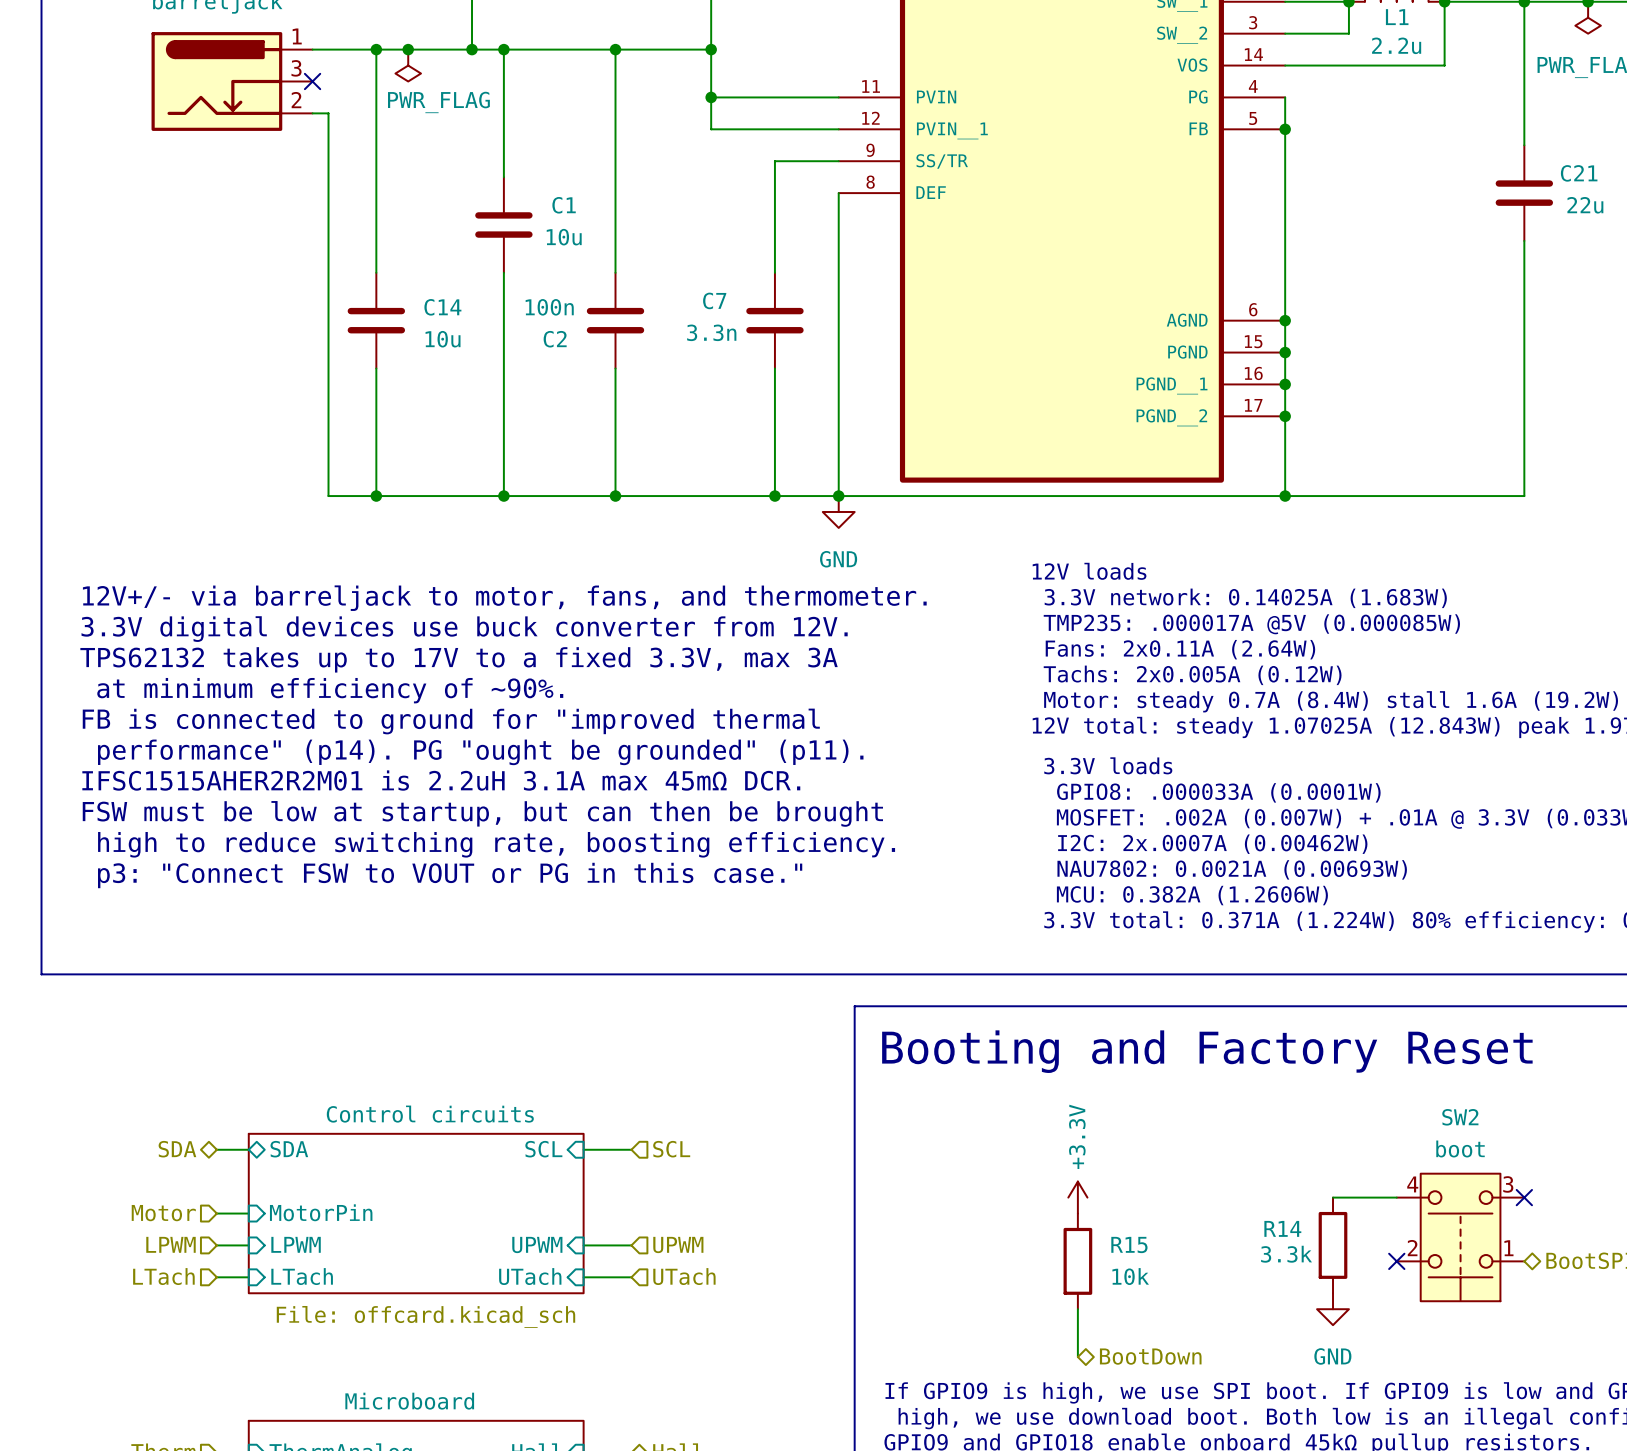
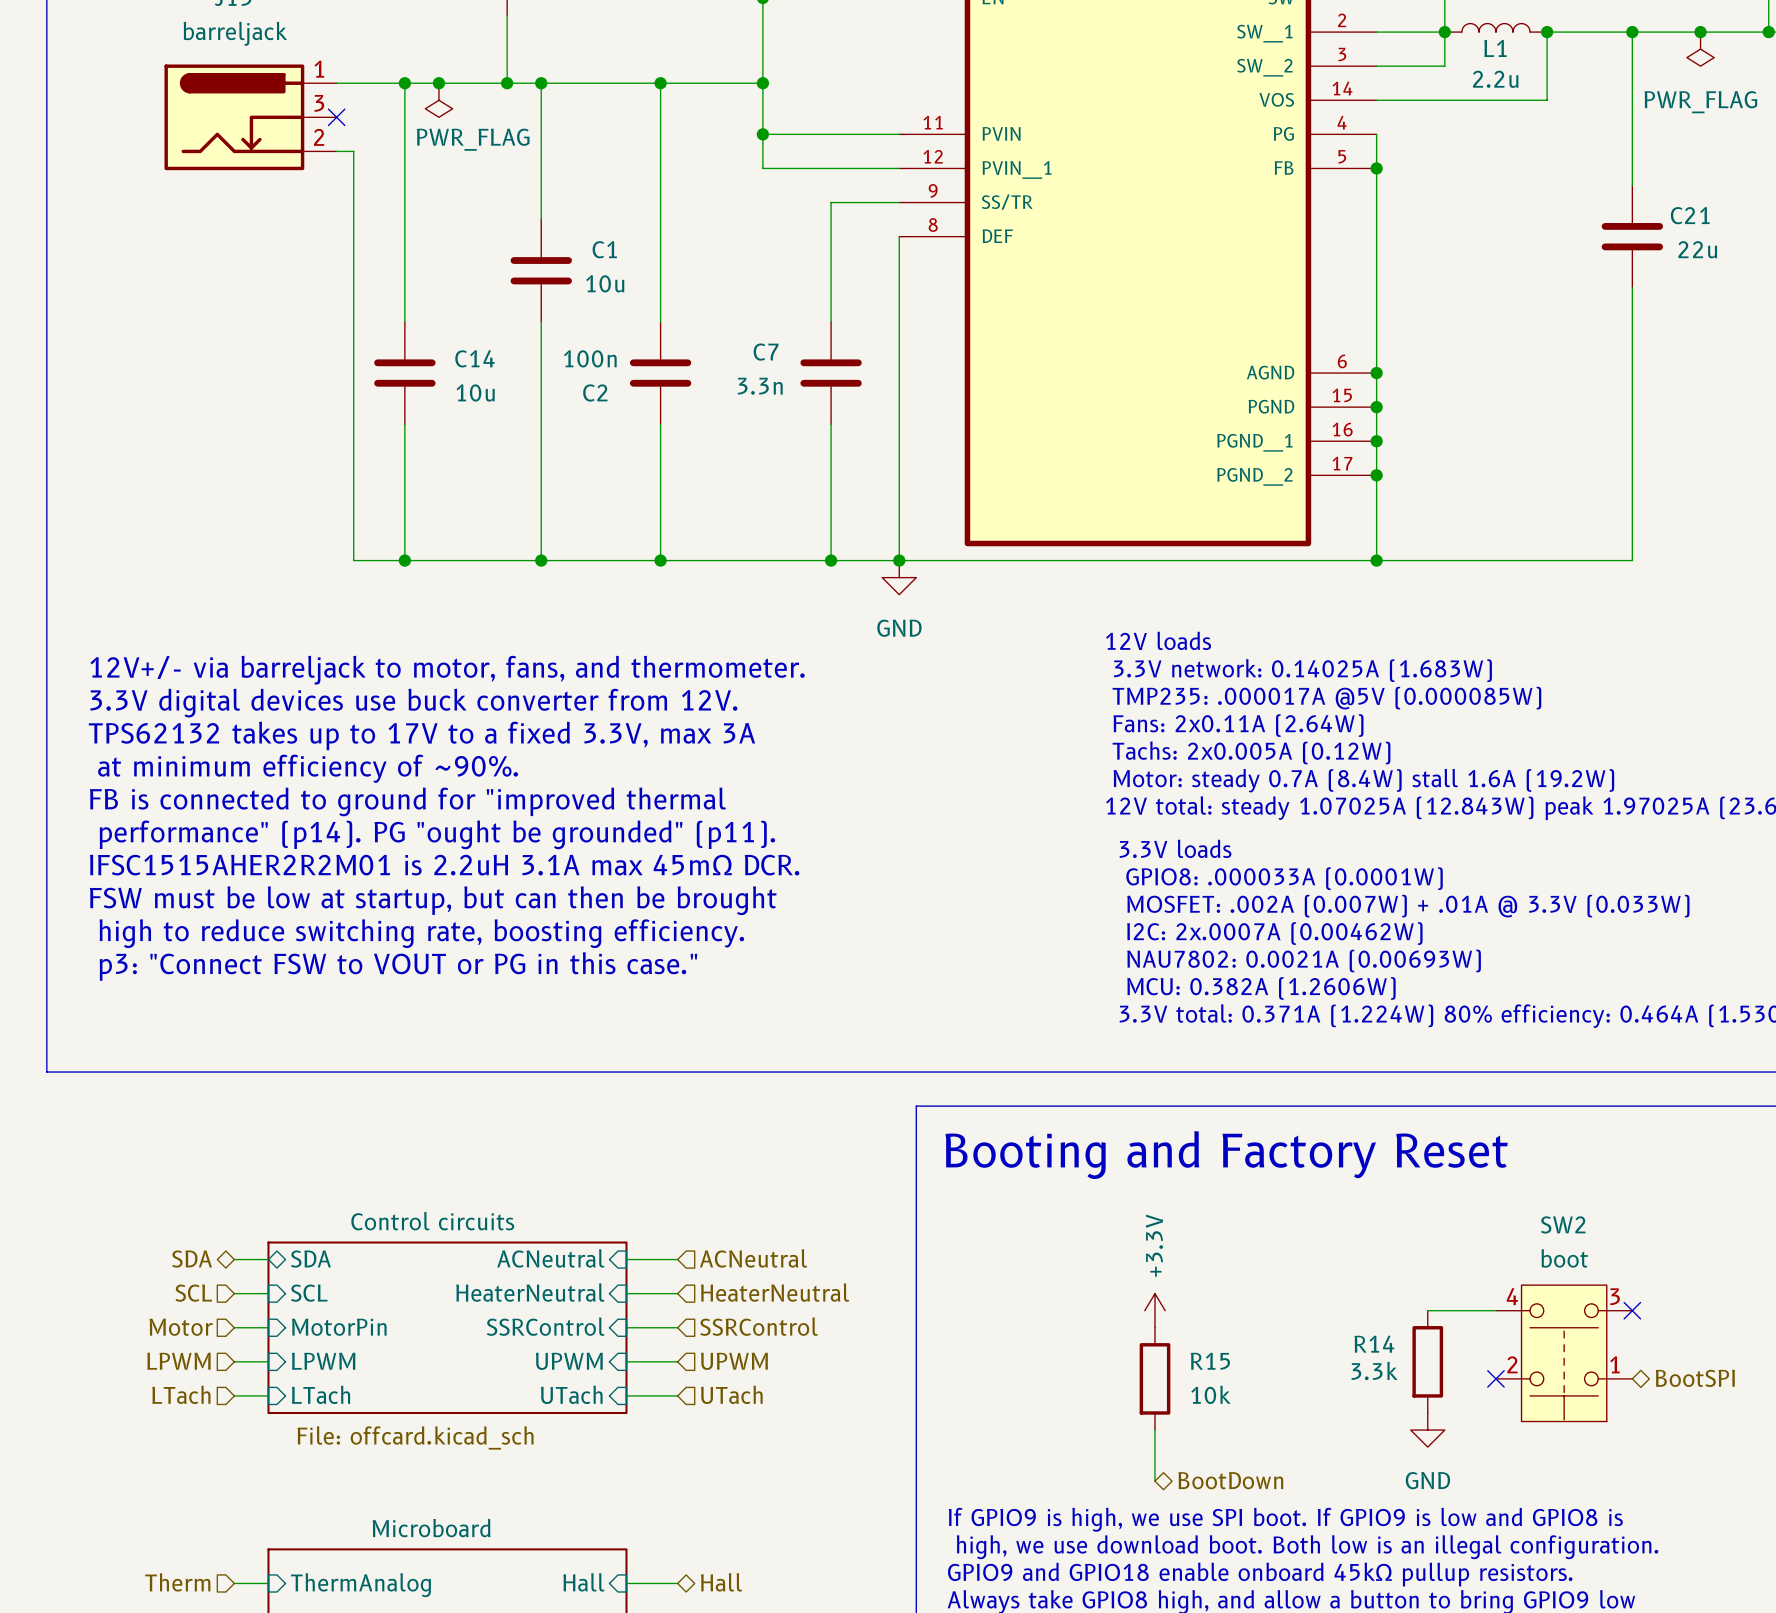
sheet pin: SCL (543, 1149) -> ACNeutral (550, 1258)
hierarchical label: SCL (671, 1149) -> ACNeutral (753, 1258)
sheet pin: none -> HeaterNeutral (530, 1292)
hierarchical label: none -> HeaterNeutral (775, 1292)
hierarchical label: none -> SCL (193, 1293)
wire: none -> (234, 1293) (268, 1293)
sheet pin: none -> SCL (309, 1293)
wire: none -> (626, 1293) (677, 1293)
sheet pin: none -> SSRControl (545, 1326)
hierarchical label: none -> SSRControl (759, 1326)
wire: none -> (626, 1327) (677, 1327)

